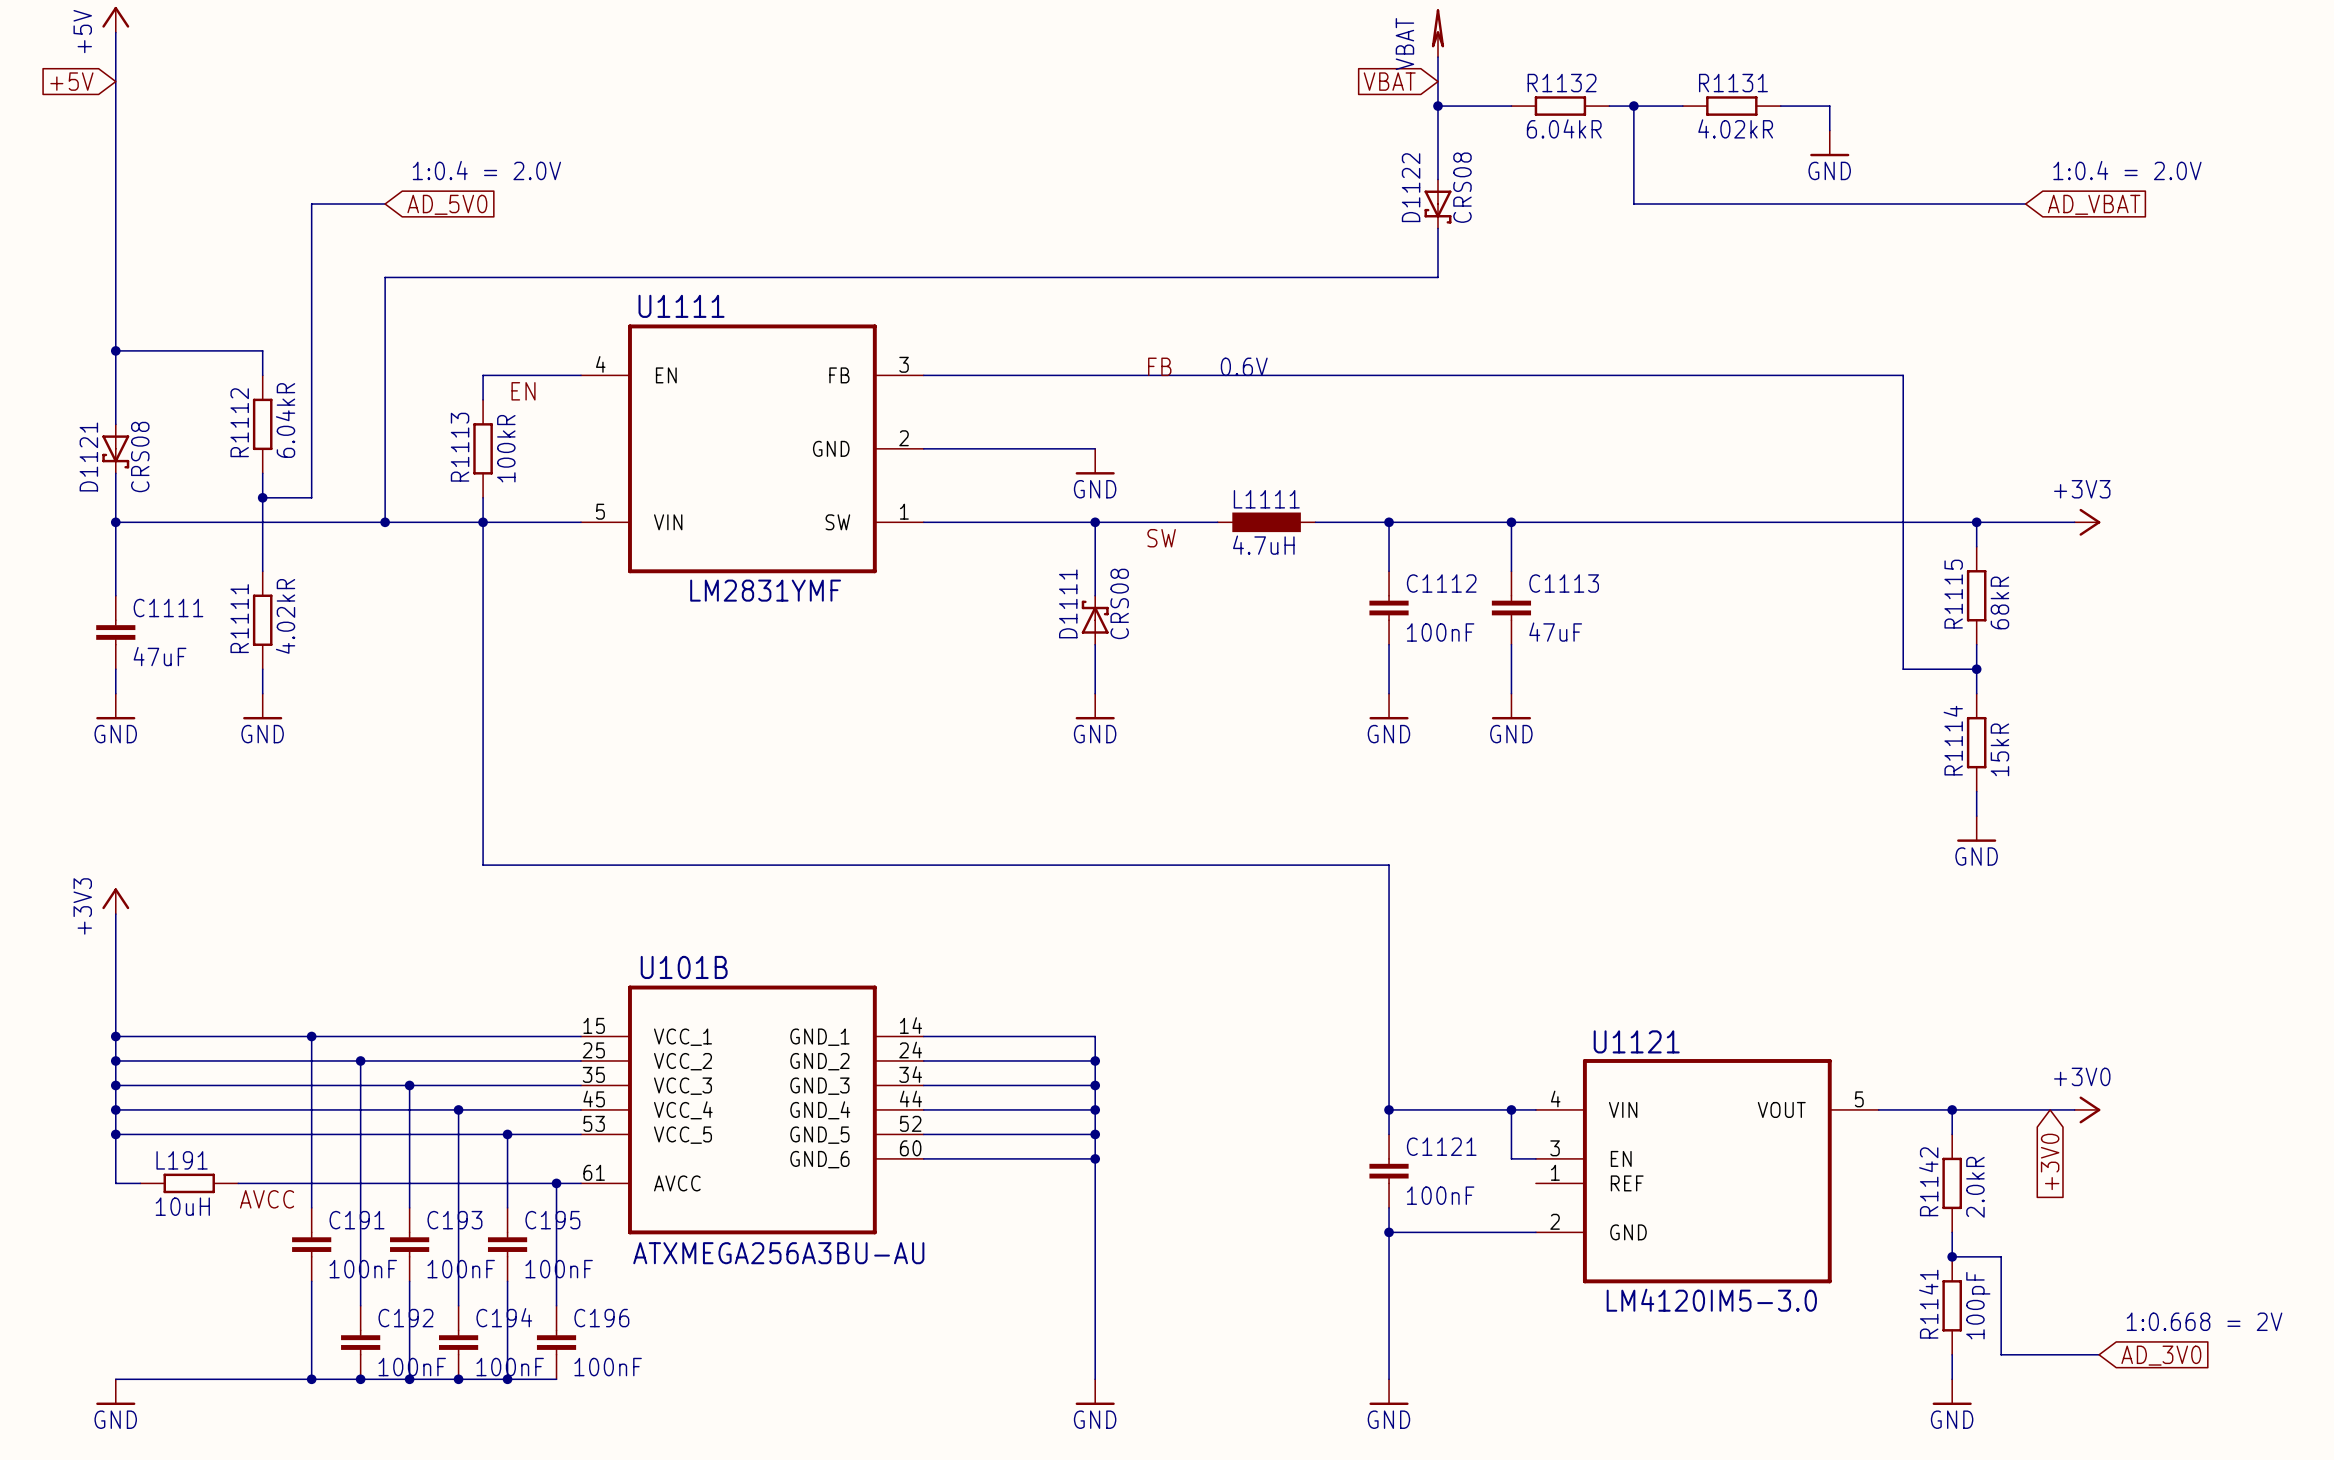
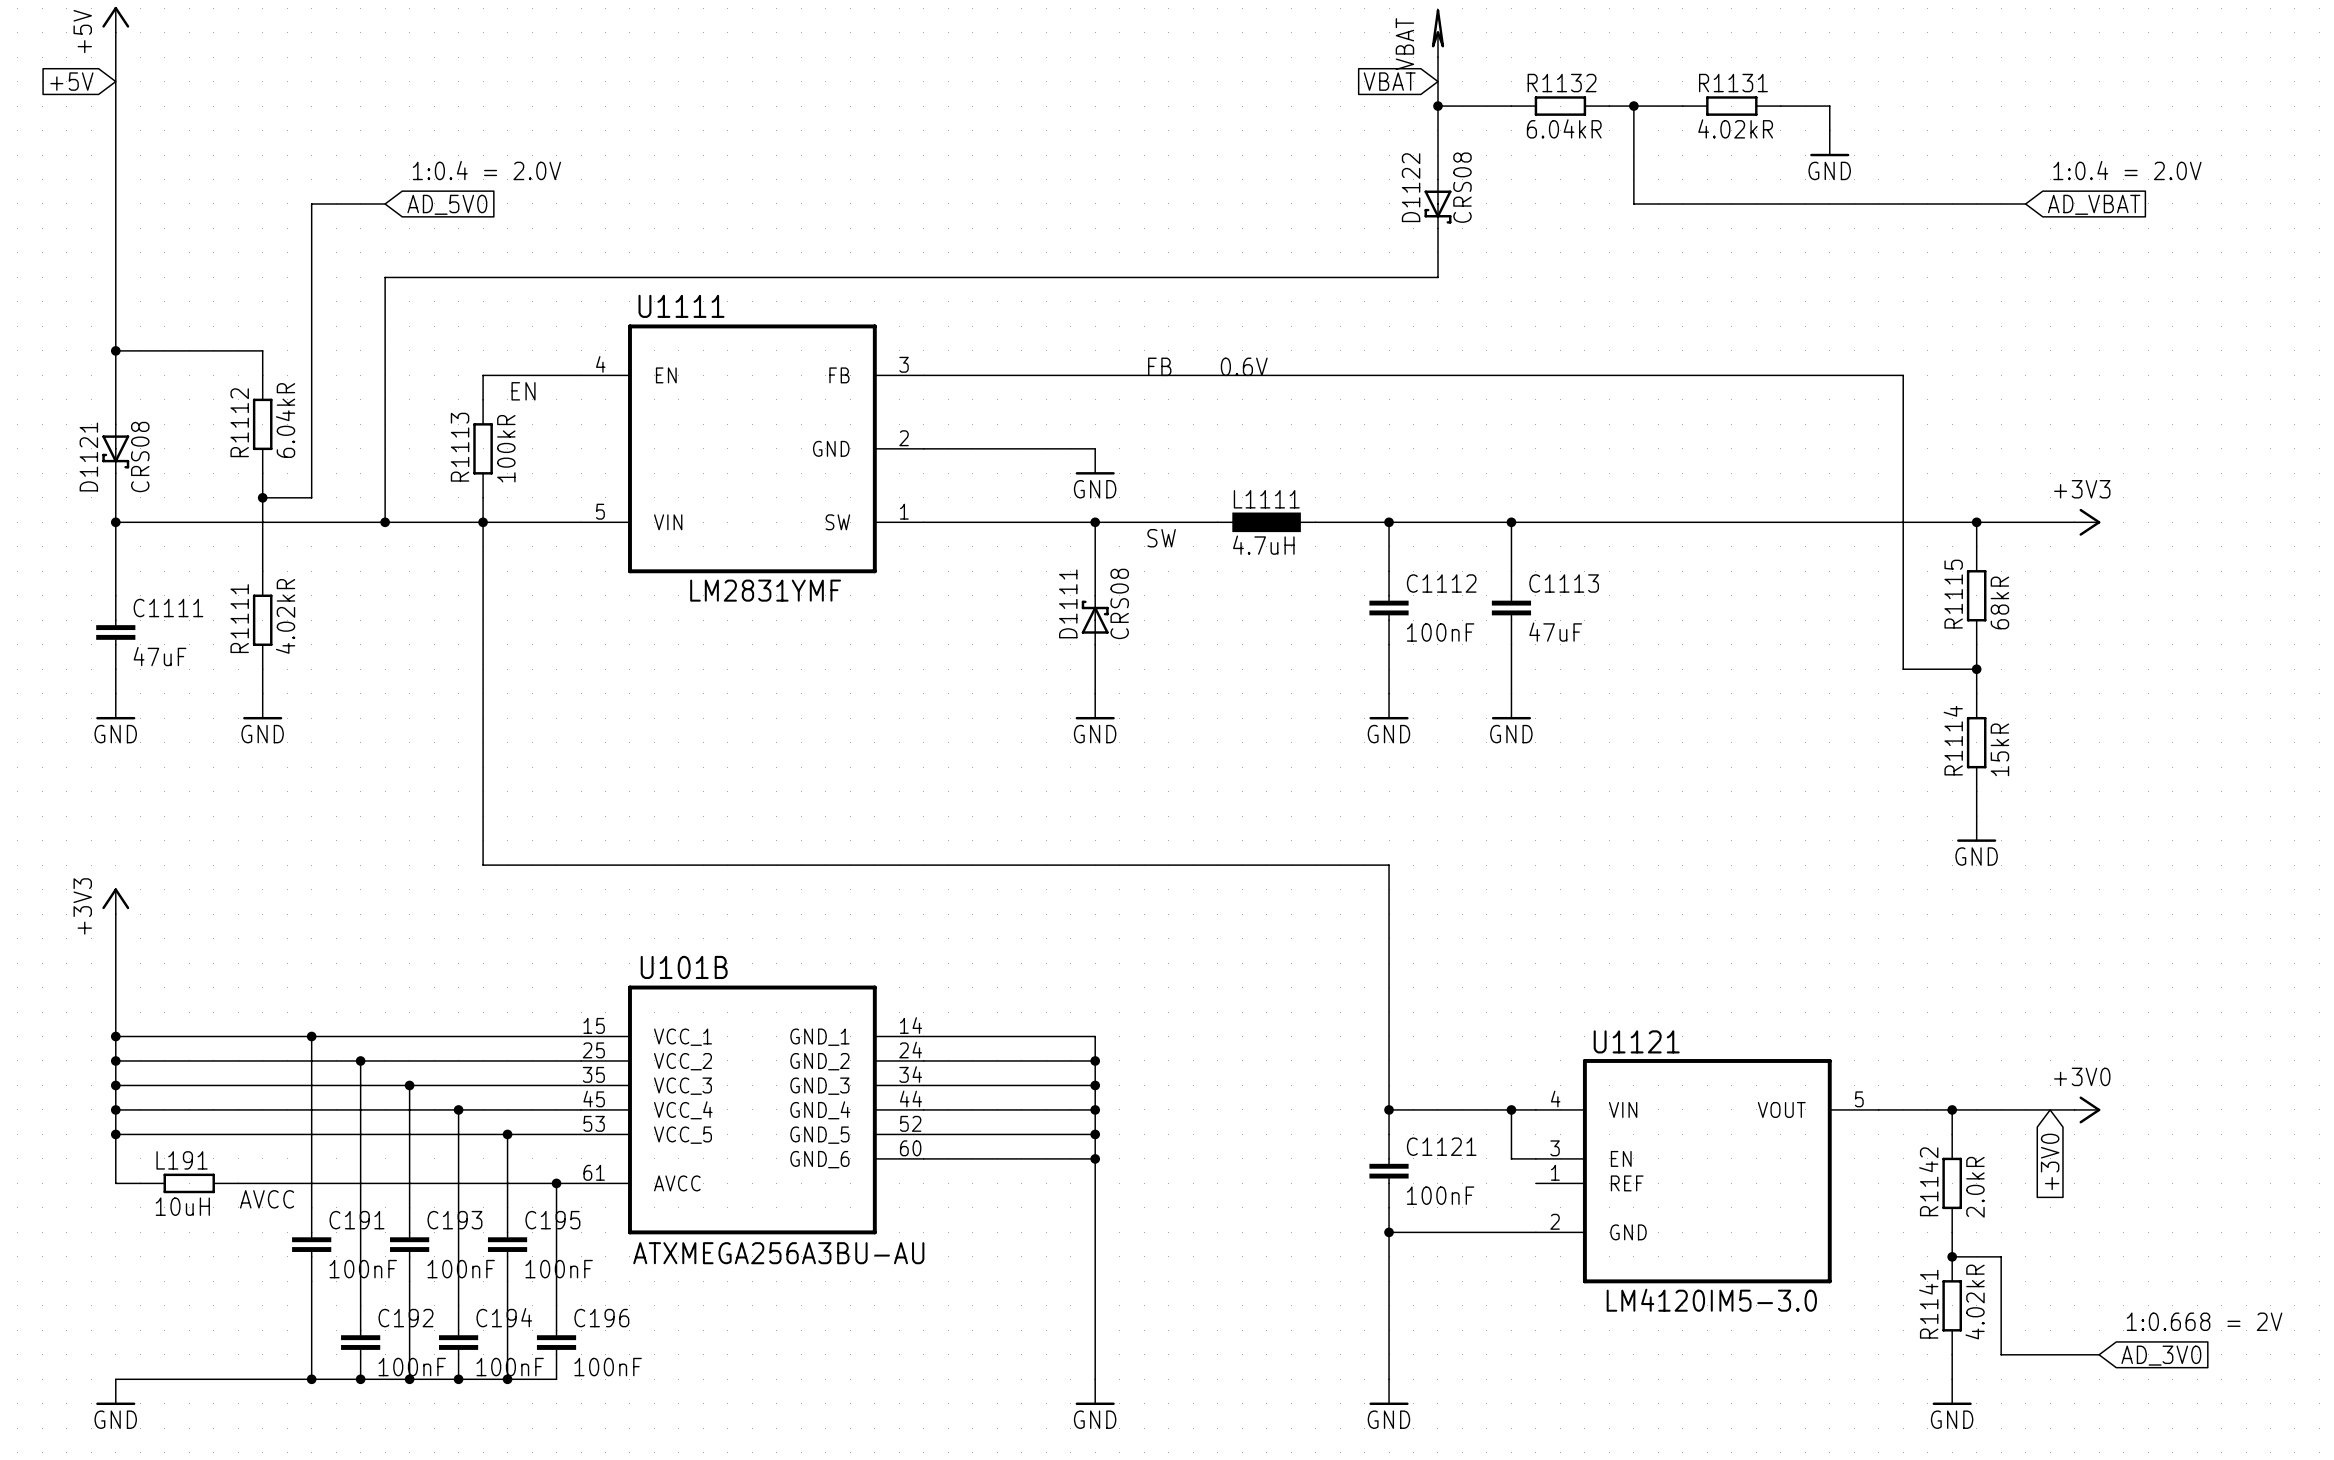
R1141 value: 100pF (1978, 1305) -> 4.02kR (1975, 1302)

